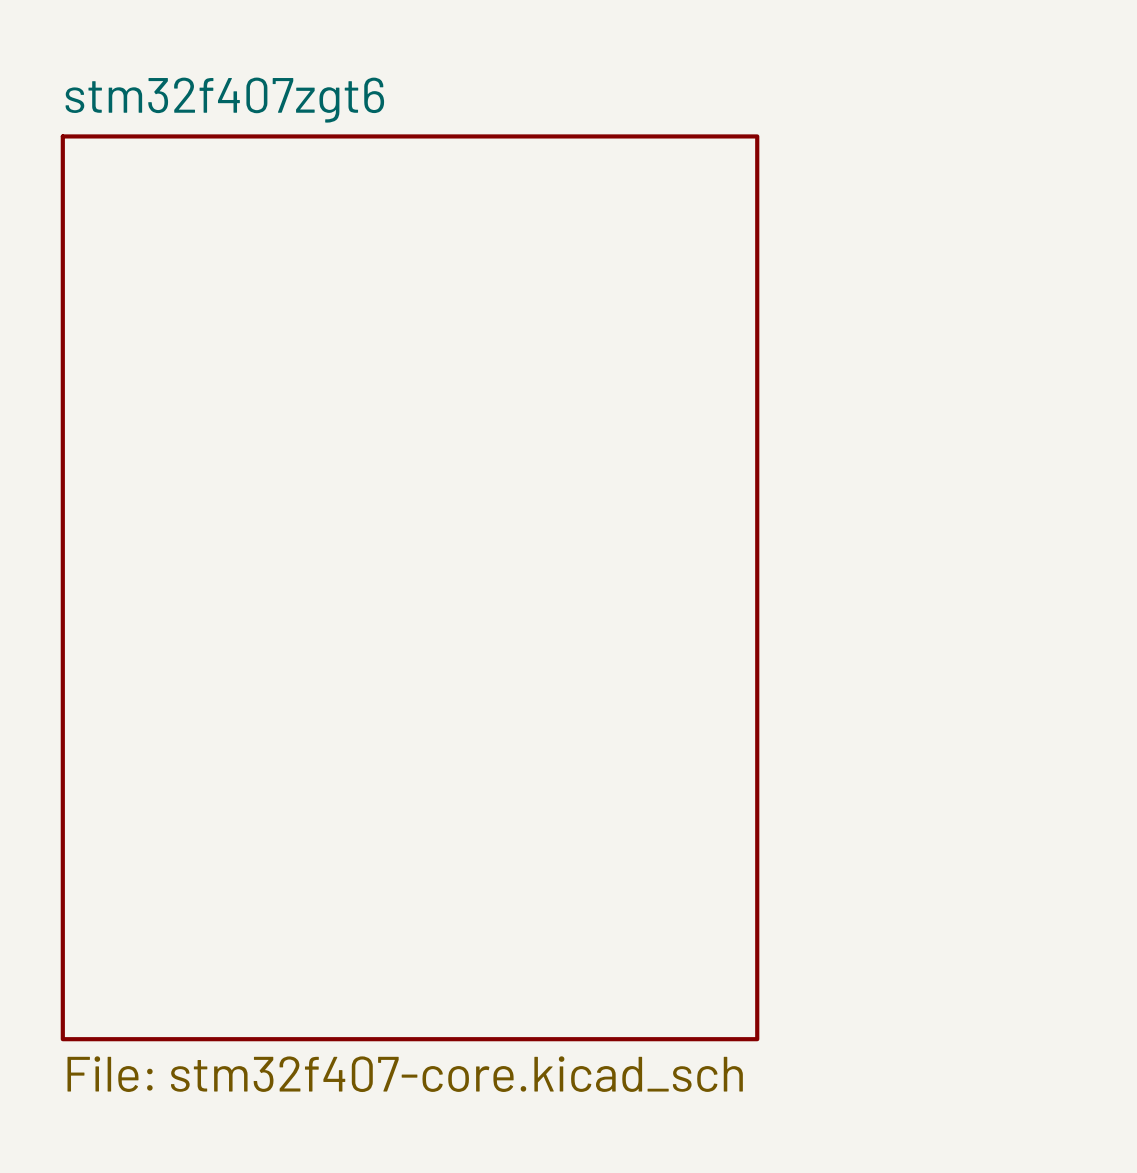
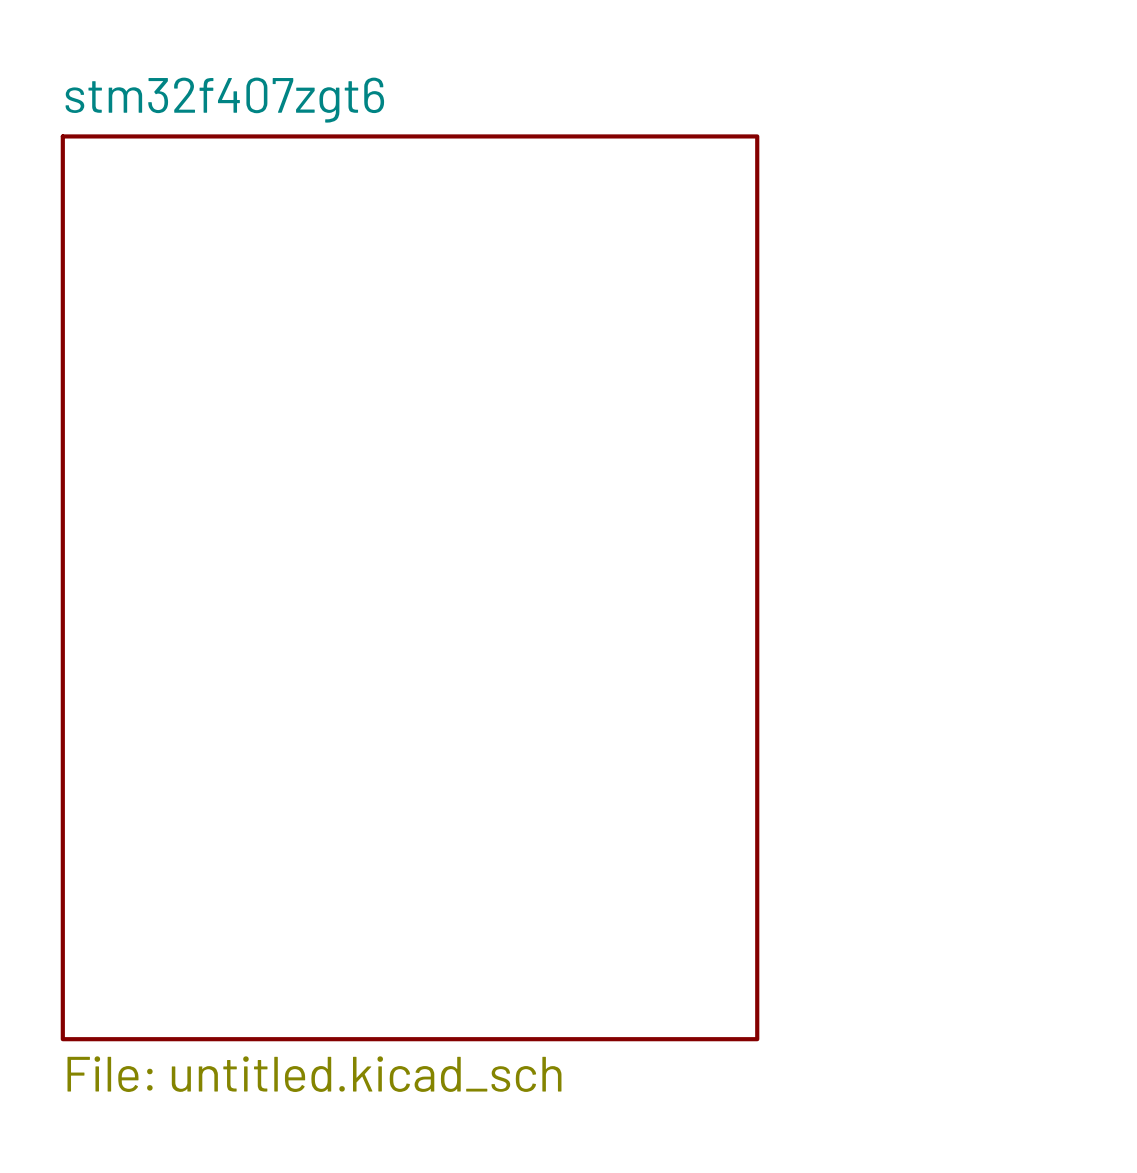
sheet stm32f407zgt6 value: File: stm32f407-core.kicad_sch (405, 1074) -> File: untitled.kicad_sch (314, 1074)

